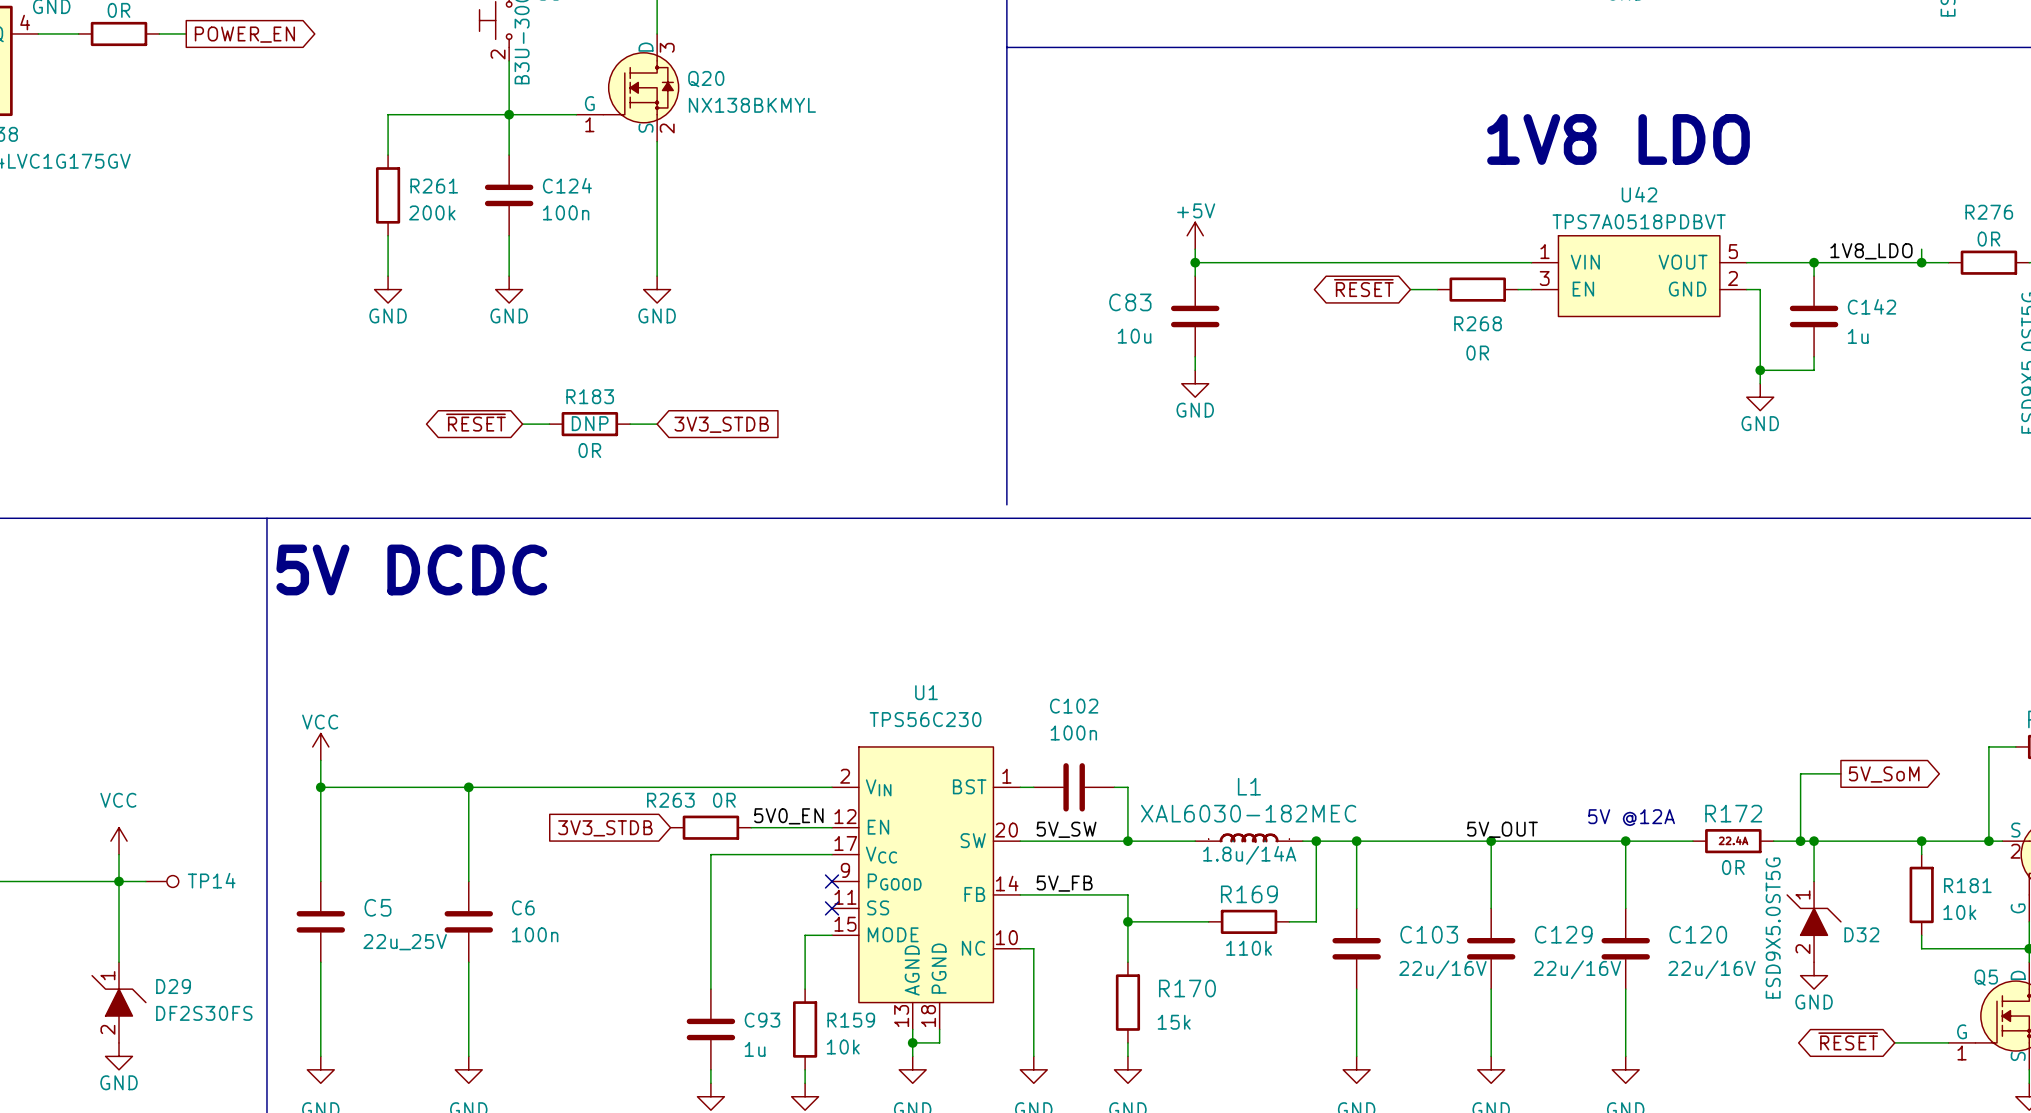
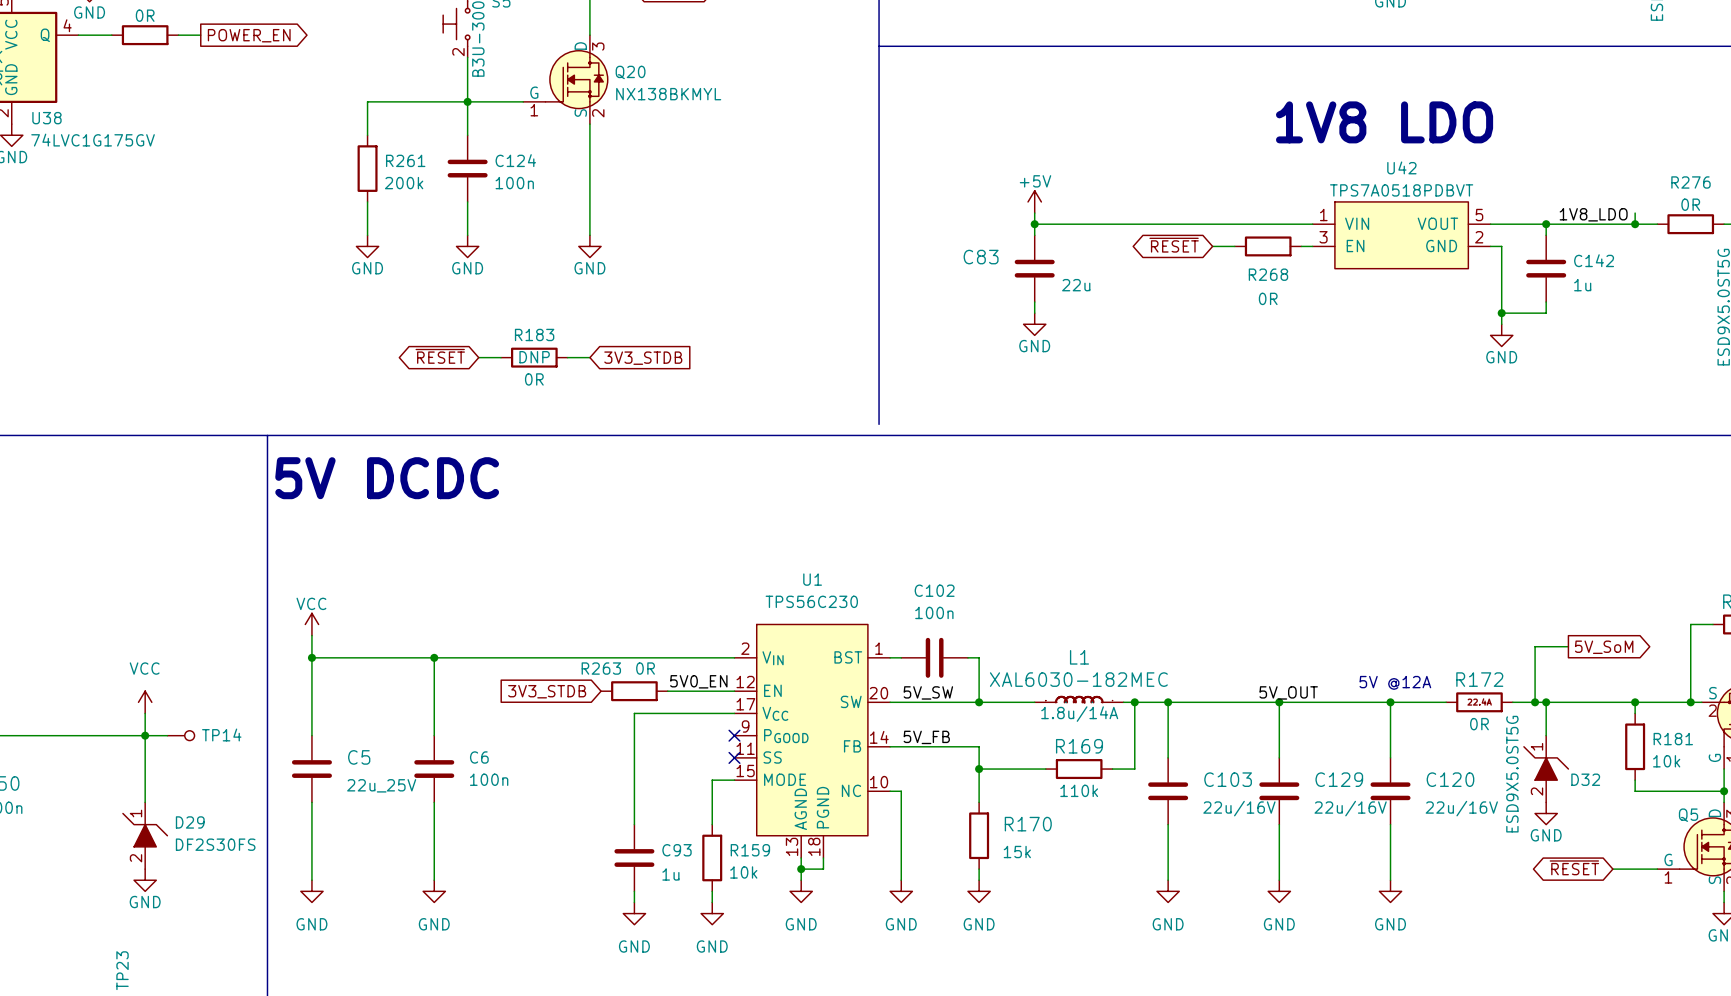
C83 text: 10u (1134, 336) -> 22u (1076, 285)

